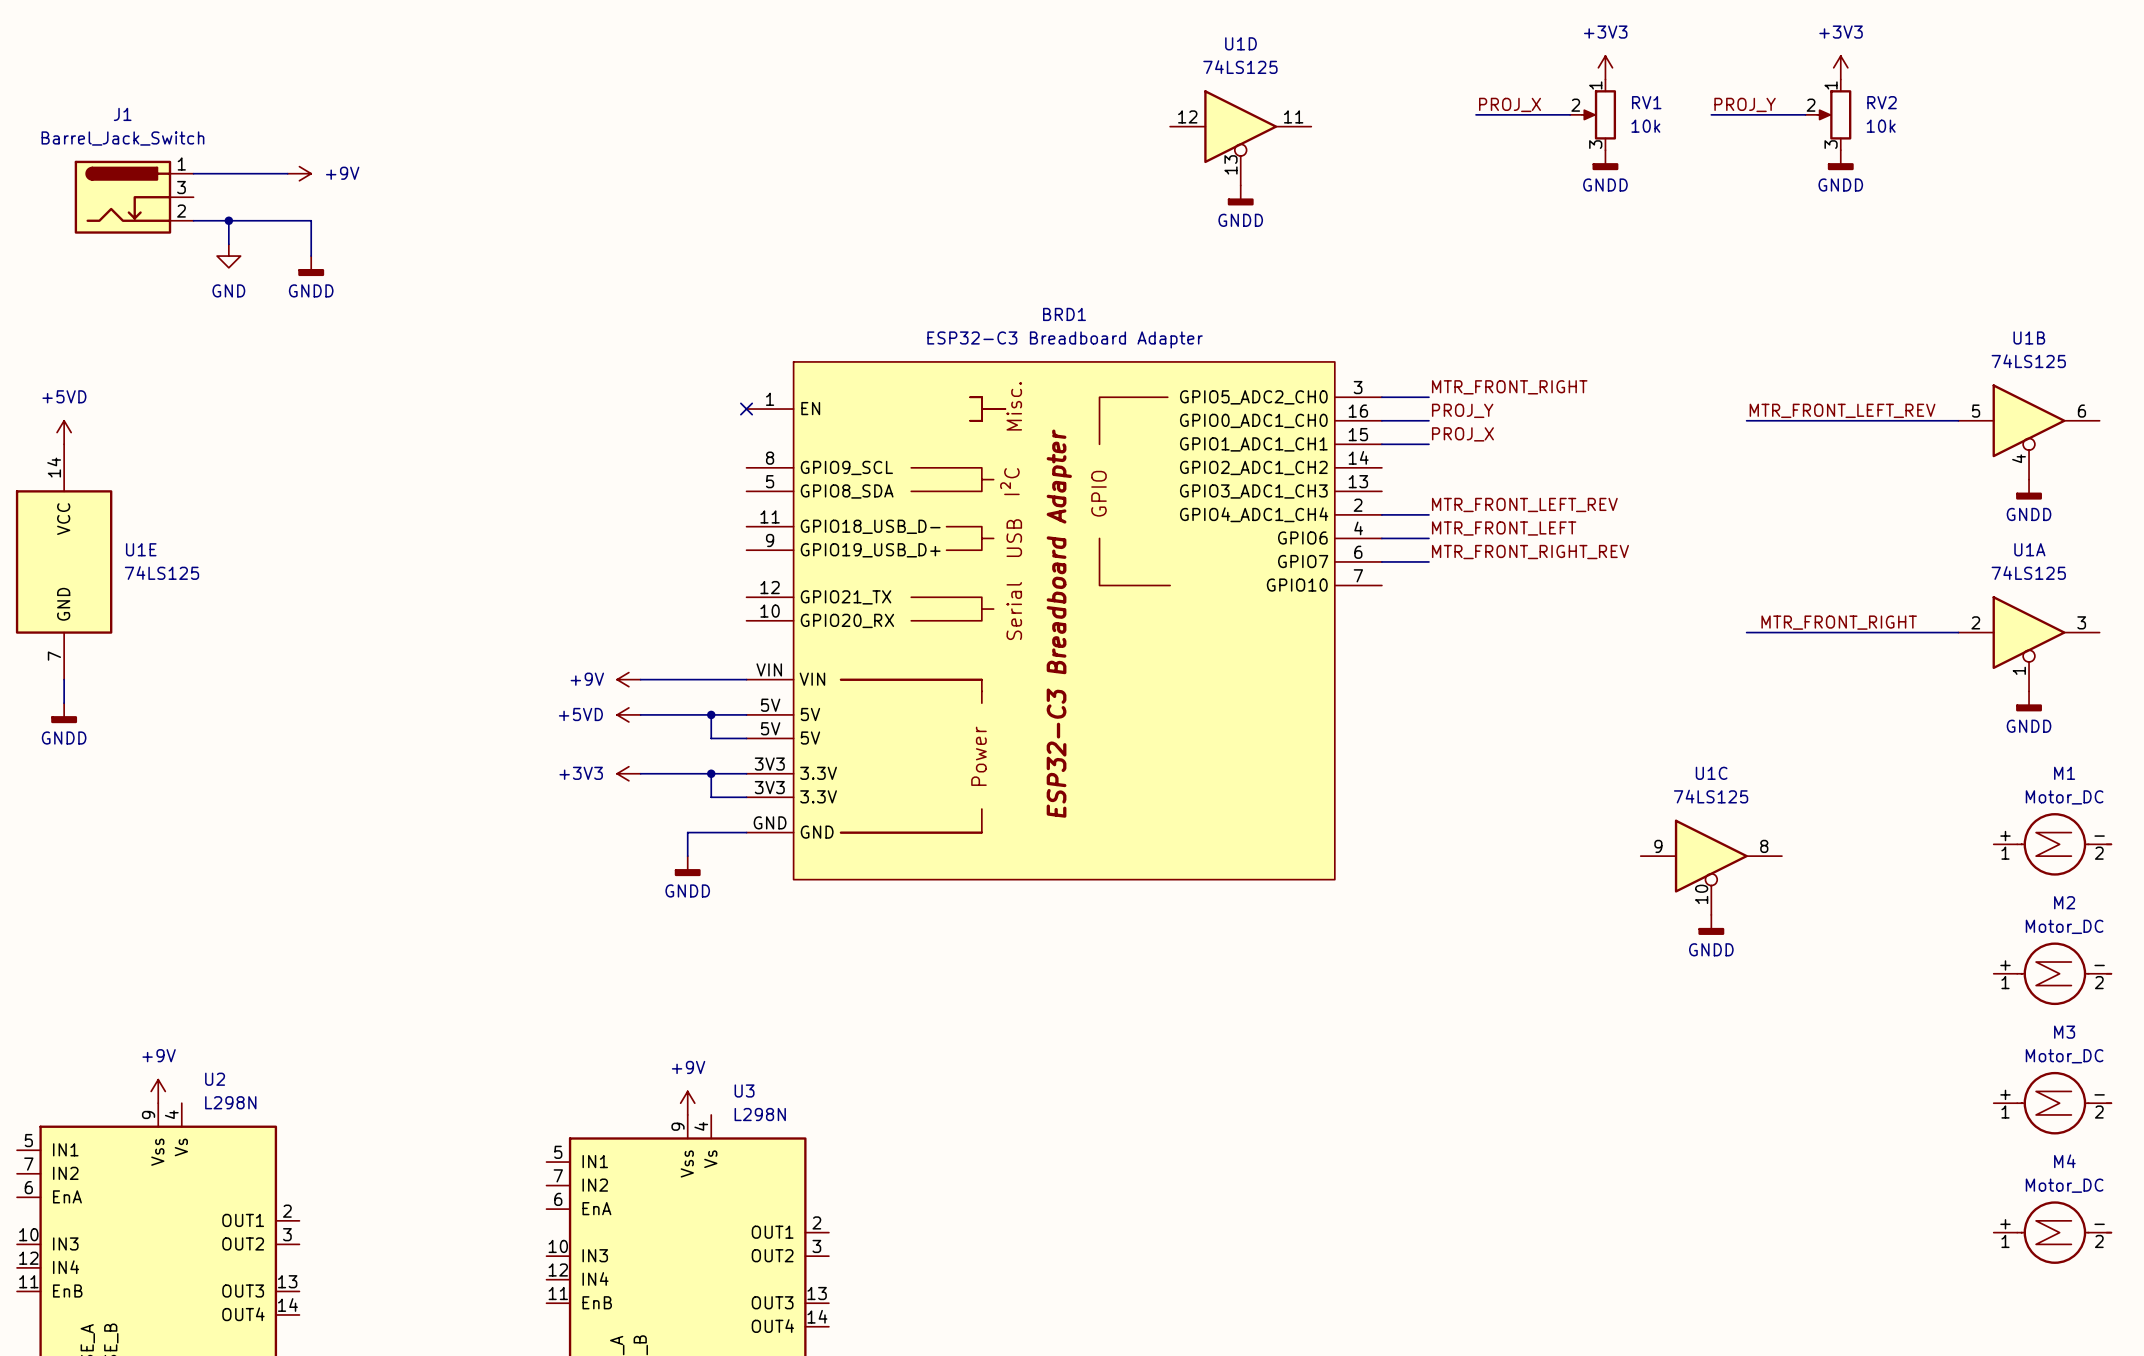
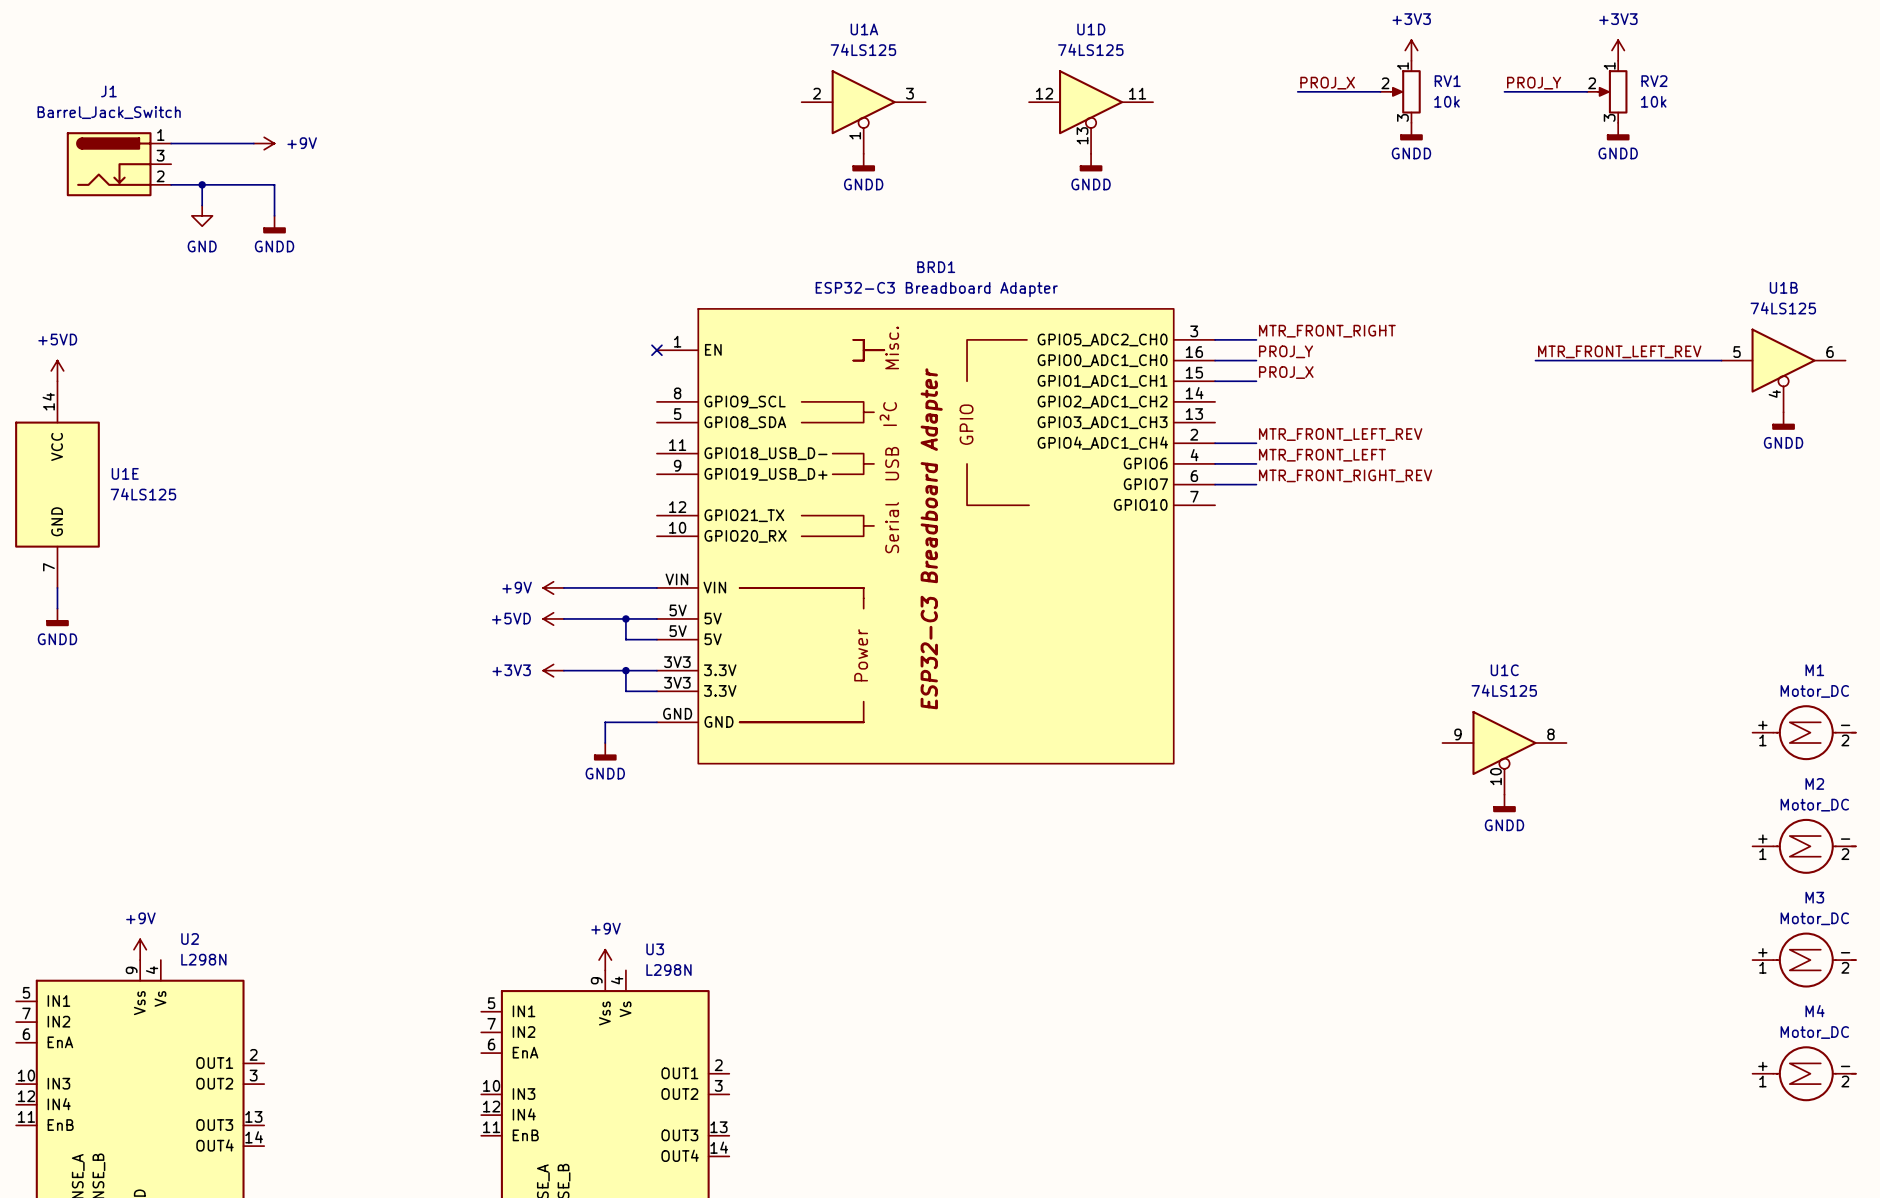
power symbol: none -> GNDD (863, 162)
label: MTR_FRONT_RIGHT (1839, 622) -> none
wire: (1746, 632) (1958, 632) -> none
U1A position: (2029, 643) -> (863, 112)
power symbol: GNDD (2029, 701) -> none

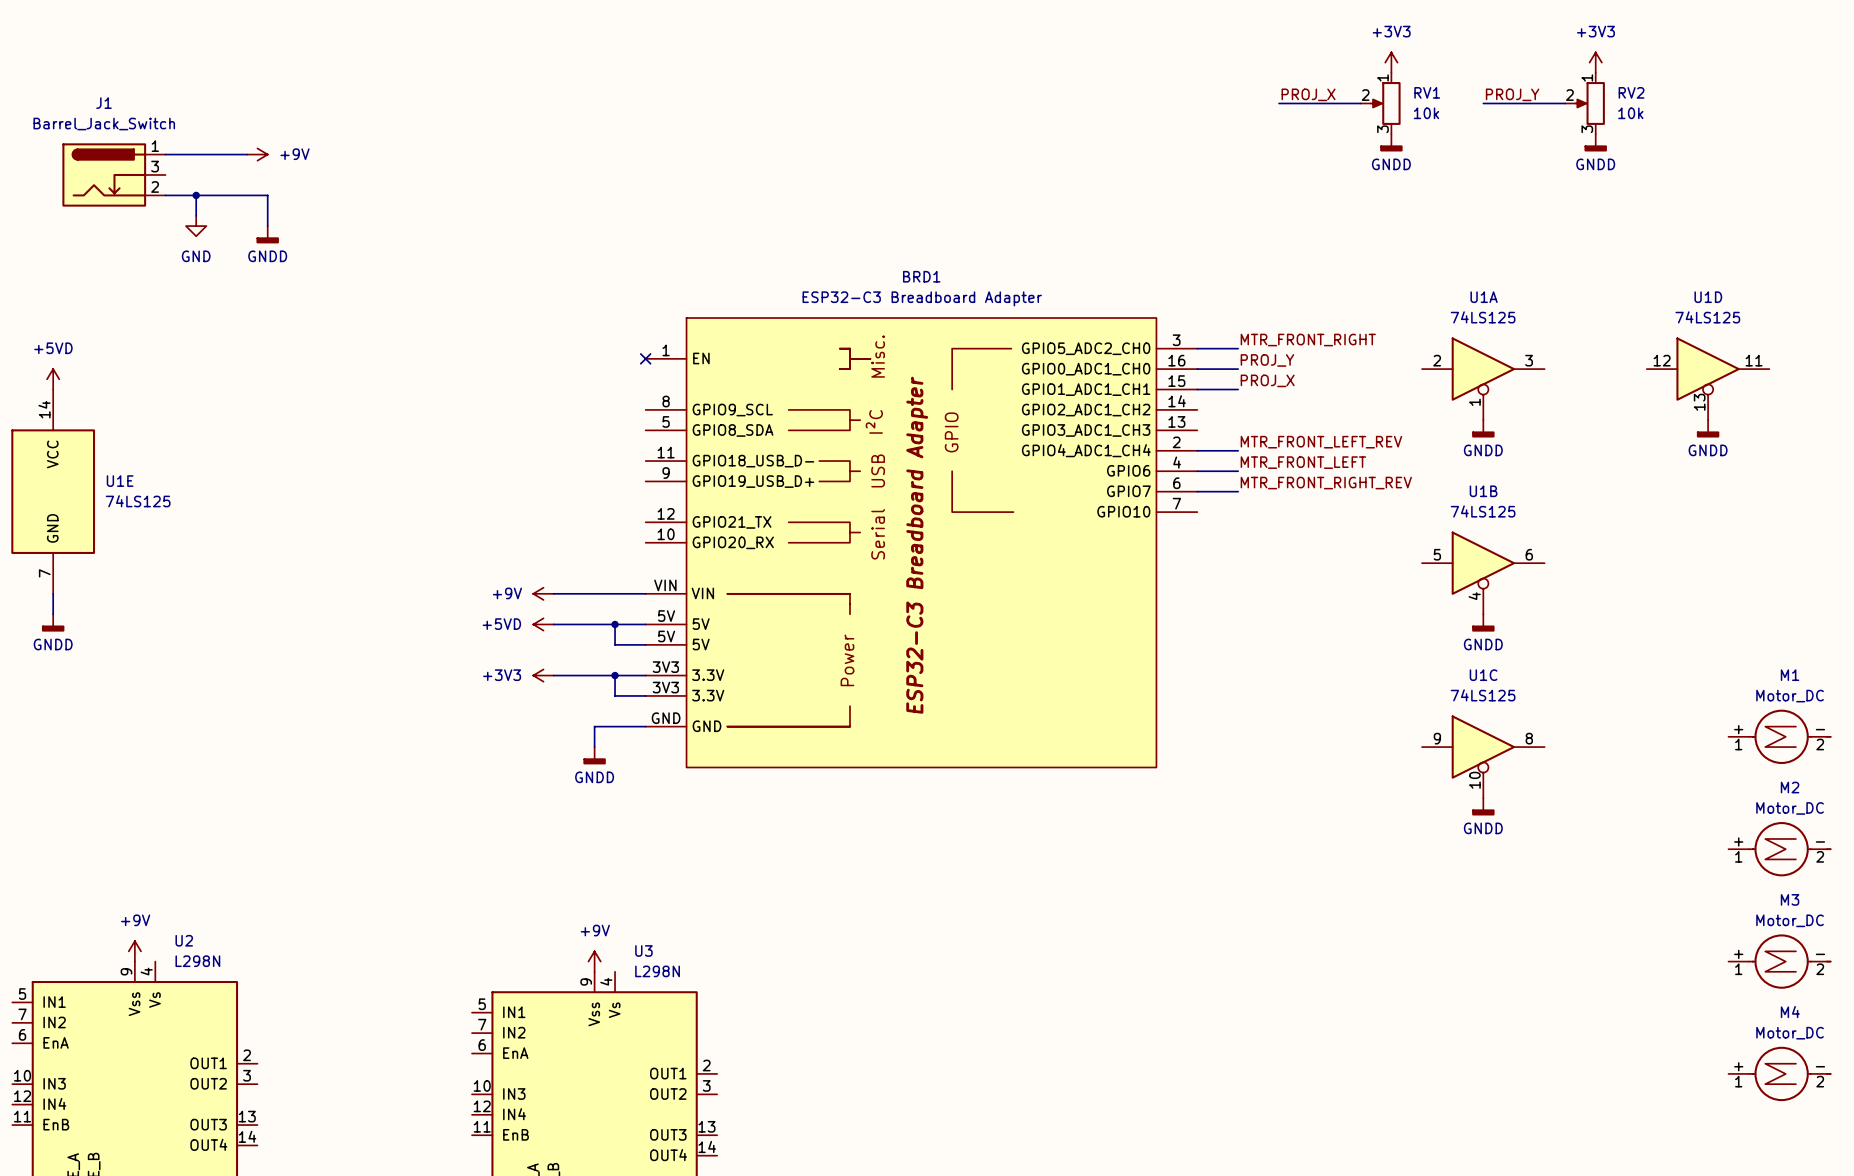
U1A position: (863, 112) -> (1483, 378)
U1D position: (1091, 112) -> (1708, 378)
power symbol: GNDD (863, 162) -> none
power symbol: GNDD (1091, 162) -> none
label: MTR_FRONT_LEFT_REV (1619, 351) -> none
wire: (1535, 360) (1721, 360) -> none
U1B position: (1783, 370) -> (1483, 572)
power symbol: none -> GNDD (1483, 428)
power symbol position: GNDD (1783, 421) -> GNDD (1708, 428)
power symbol: none -> GNDD (1483, 622)

